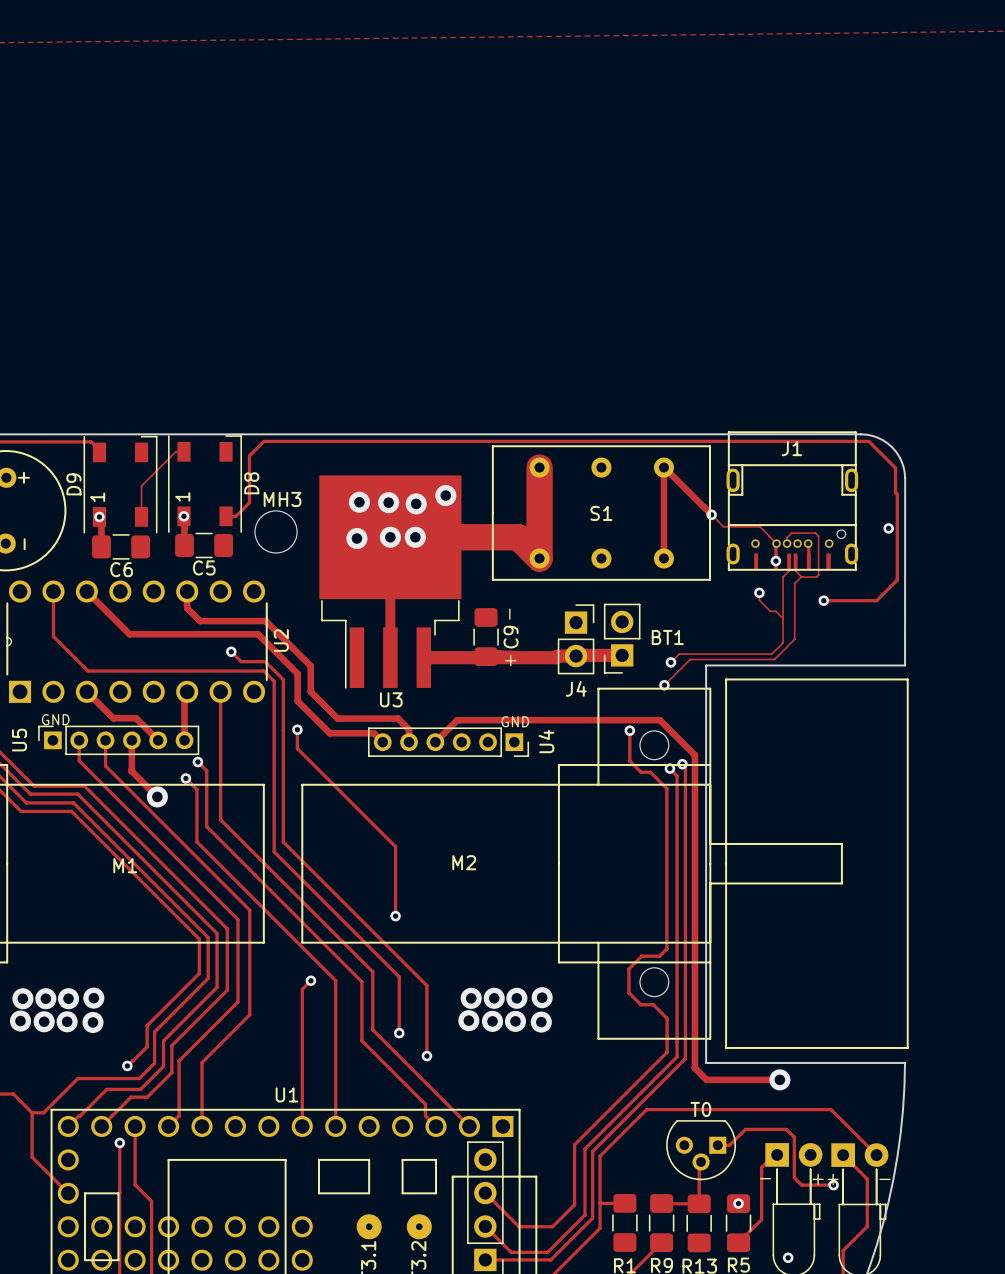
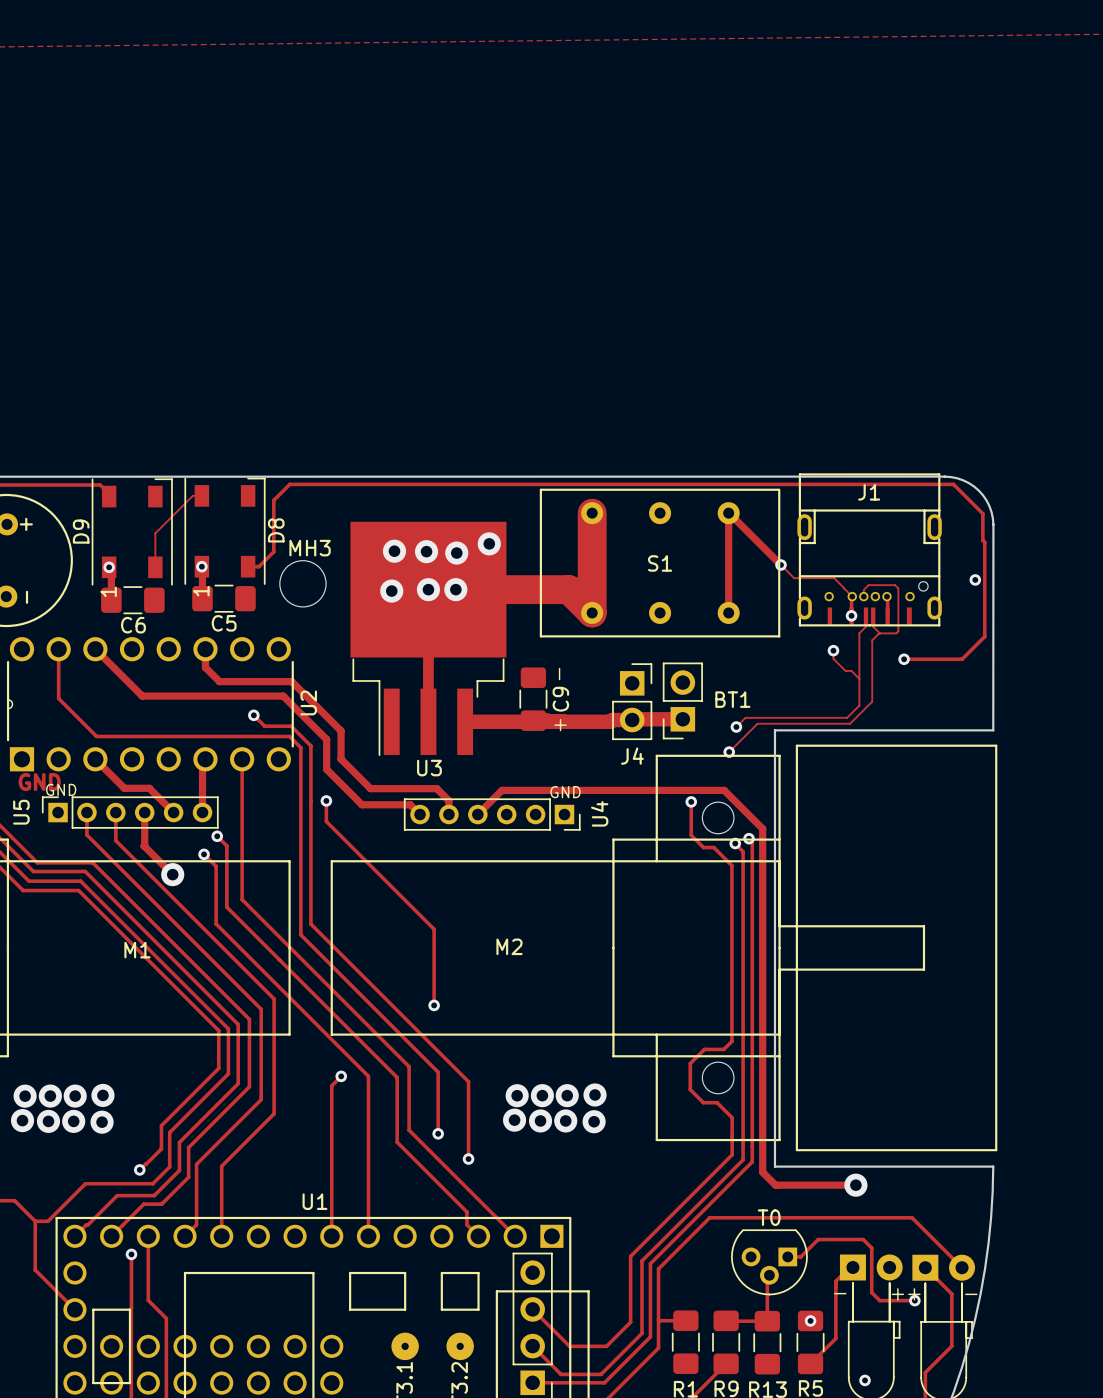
D8 text position: 1 (182, 496) -> 1 (201, 591)
D9 text position: 1 (97, 497) -> 1 (108, 591)
text: none -> GND (39, 782)

